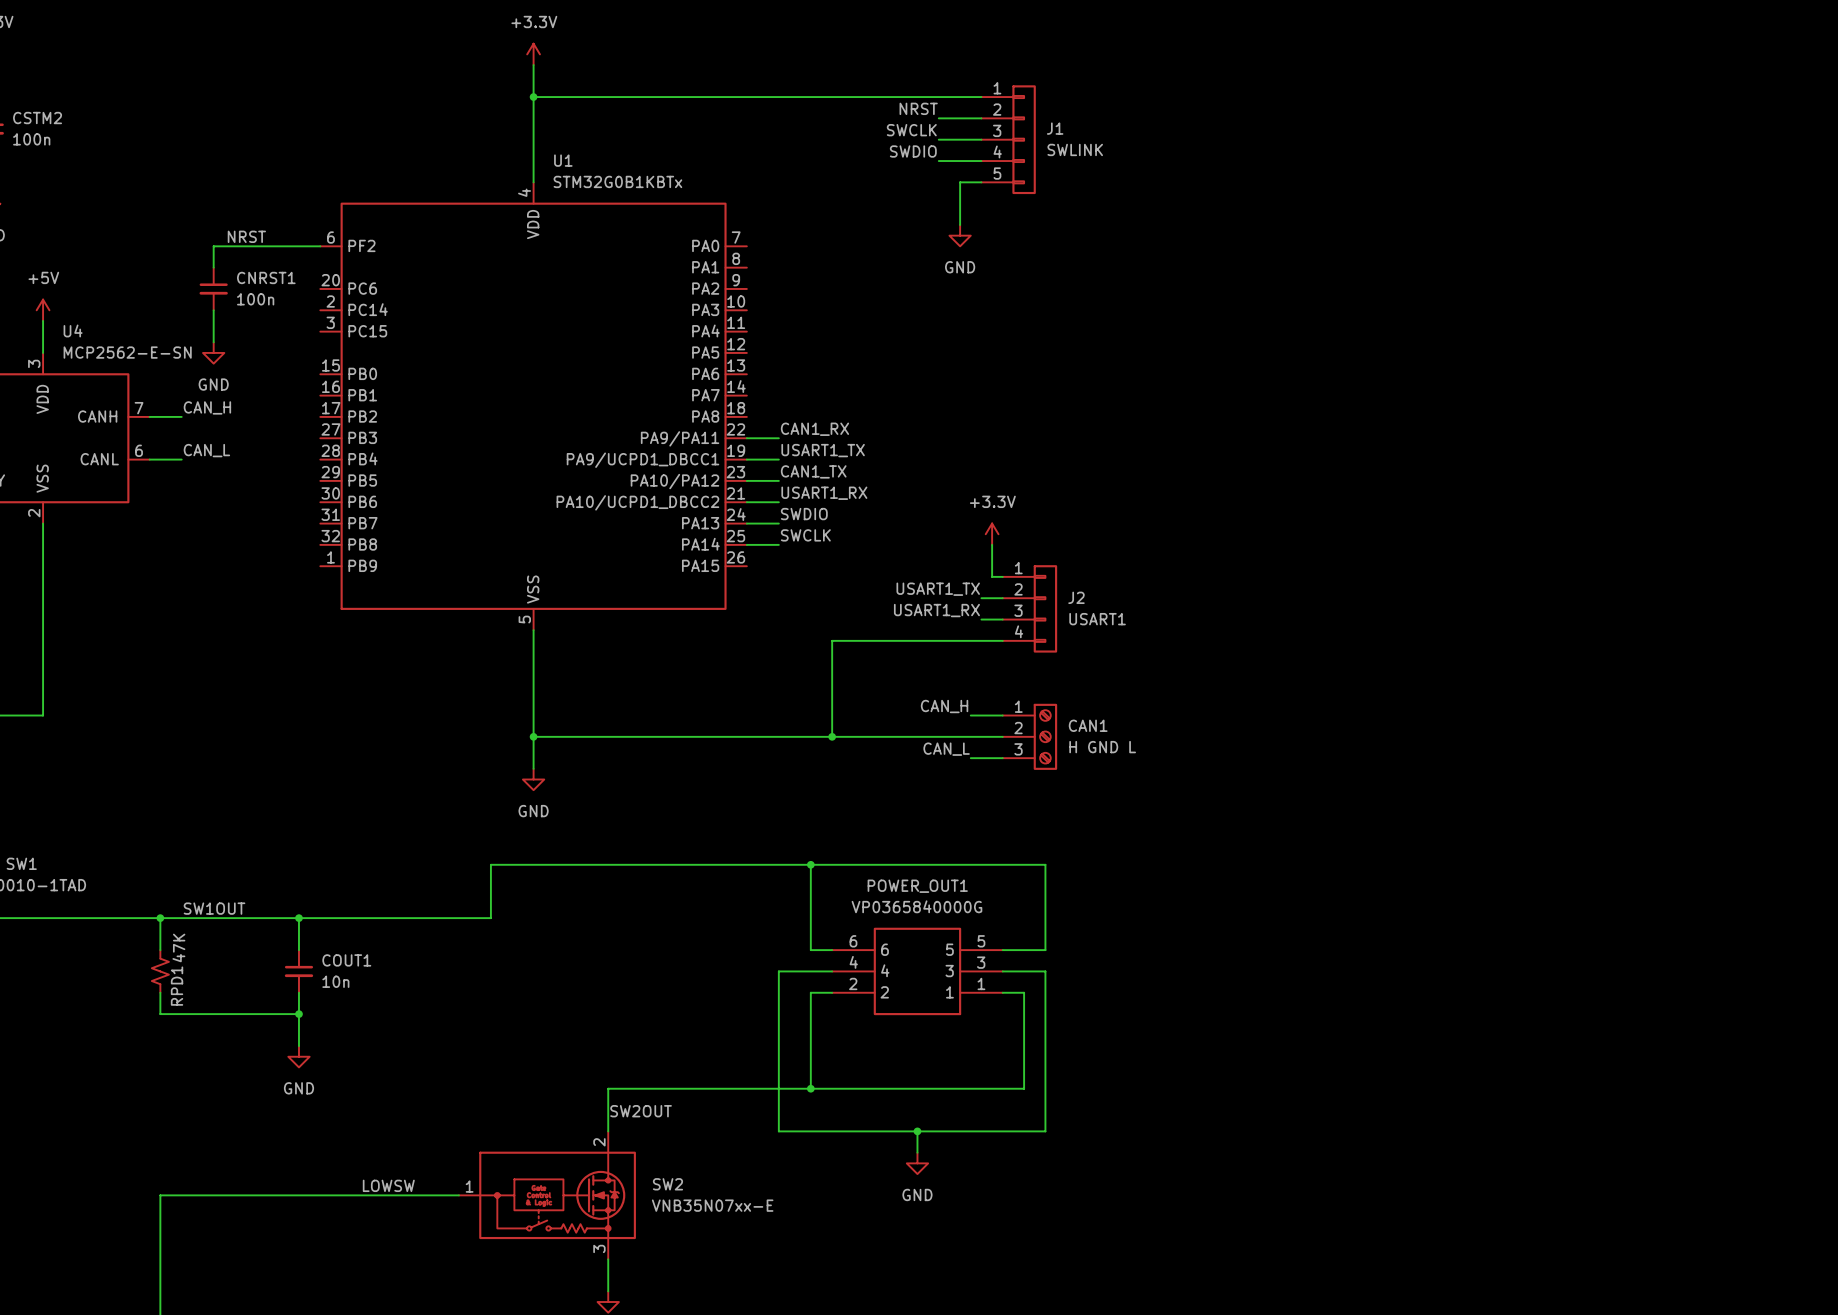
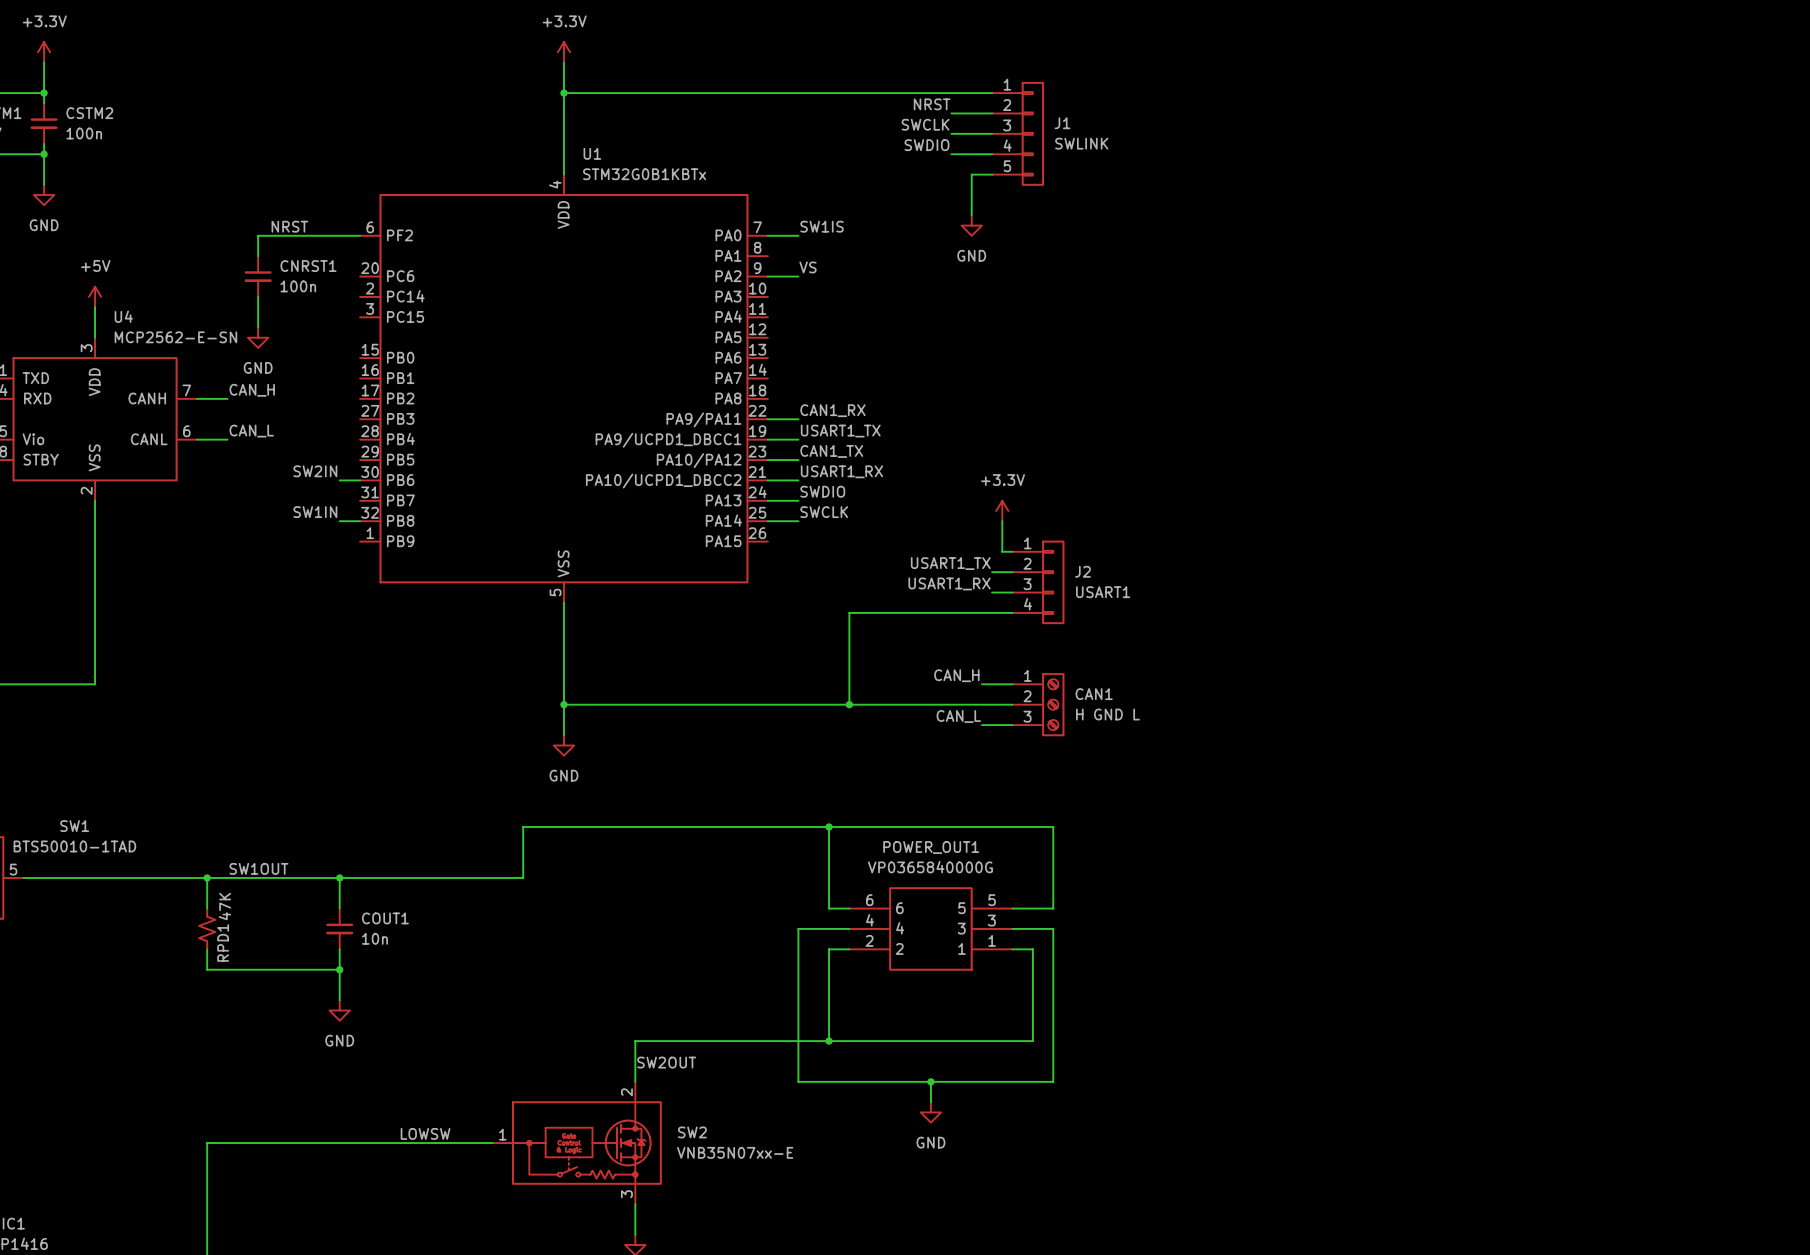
label: none -> SW1IS (822, 226)
wire: none -> (767, 235) (798, 235)
label: none -> VS (807, 267)
wire: none -> (767, 276) (798, 276)
label: none -> SW2IN (315, 471)
wire: none -> (339, 480) (360, 480)
label: none -> SW1IN (315, 512)
wire: none -> (339, 521) (360, 521)

